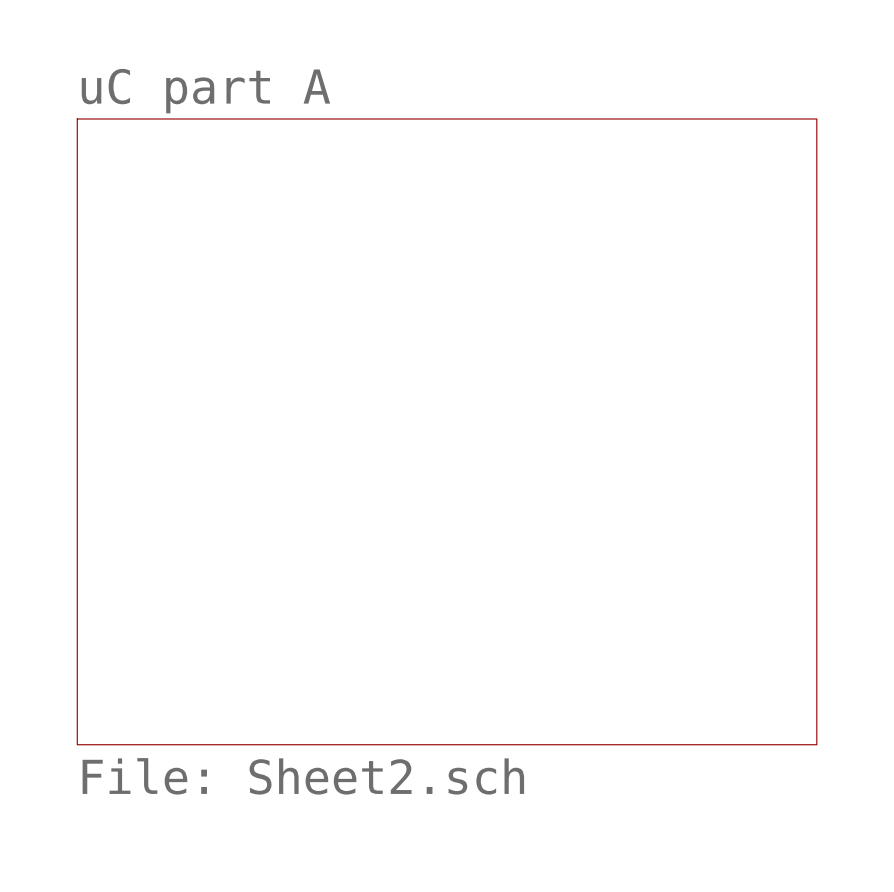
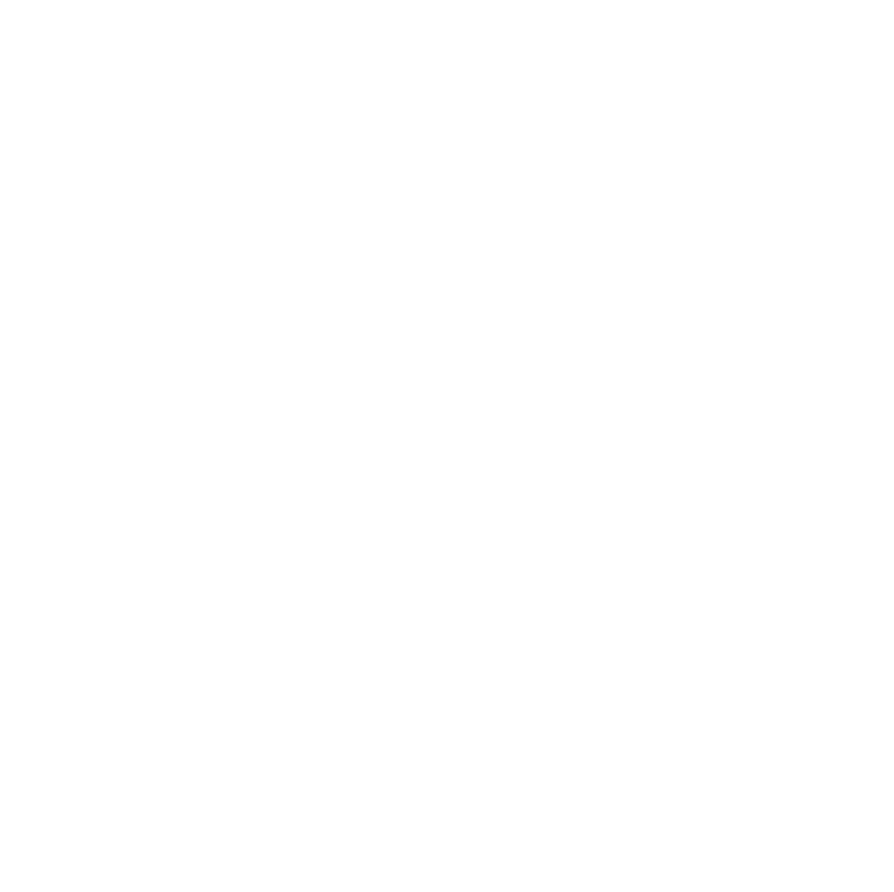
sheet uC part A: File: Sheet2.sch (447, 431) -> none

